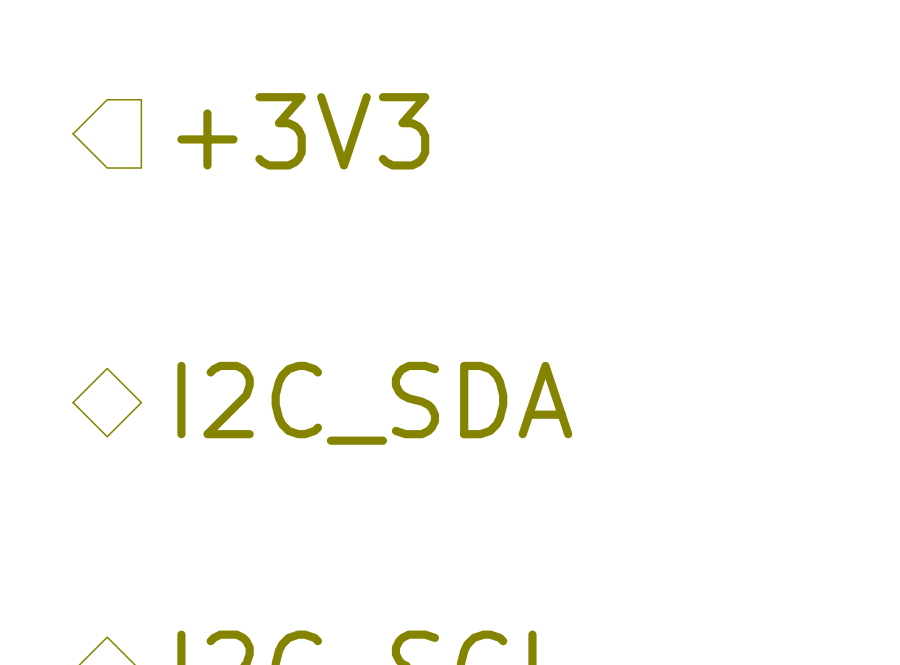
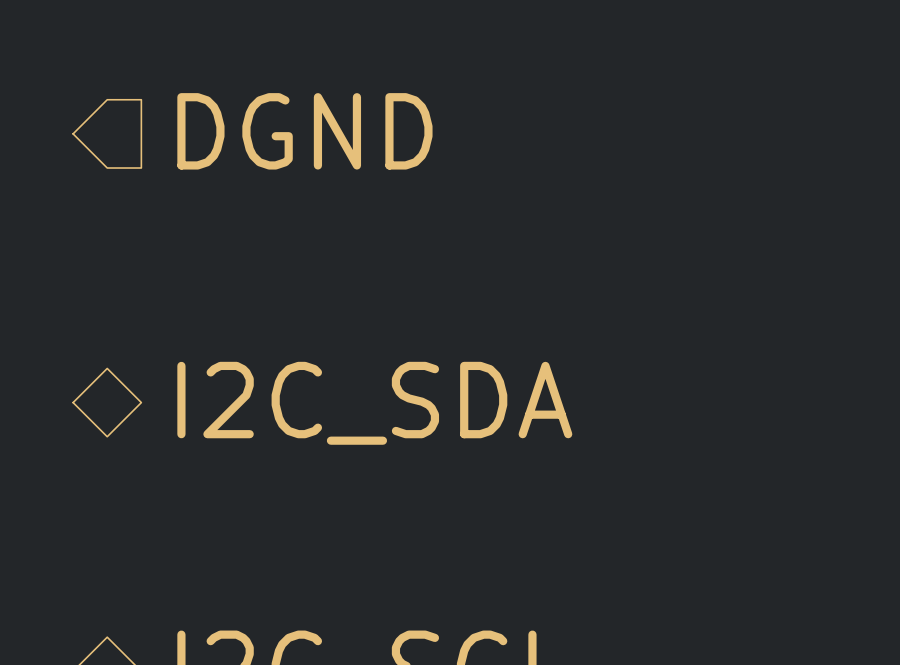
hierarchical label: +3V3 (303, 131) -> DGND (304, 131)

